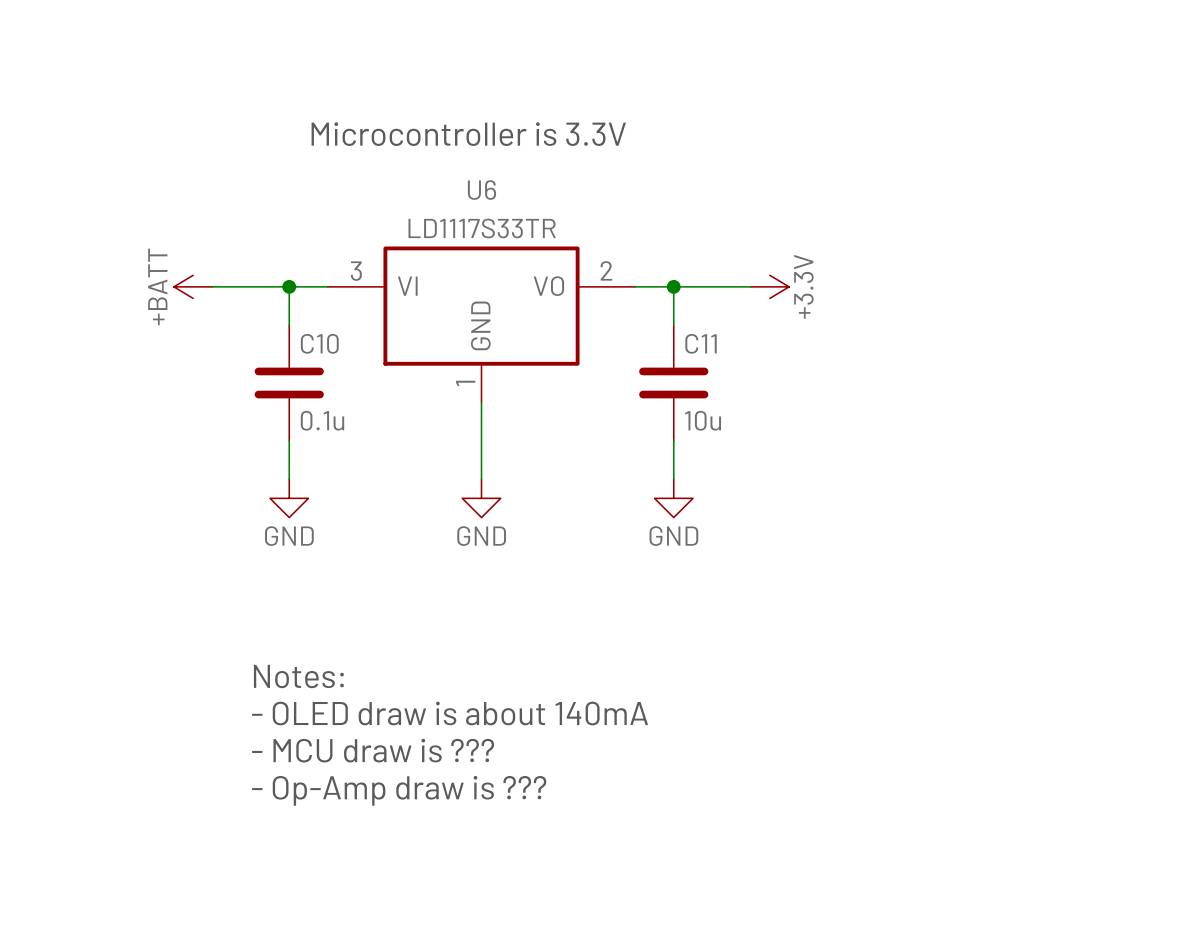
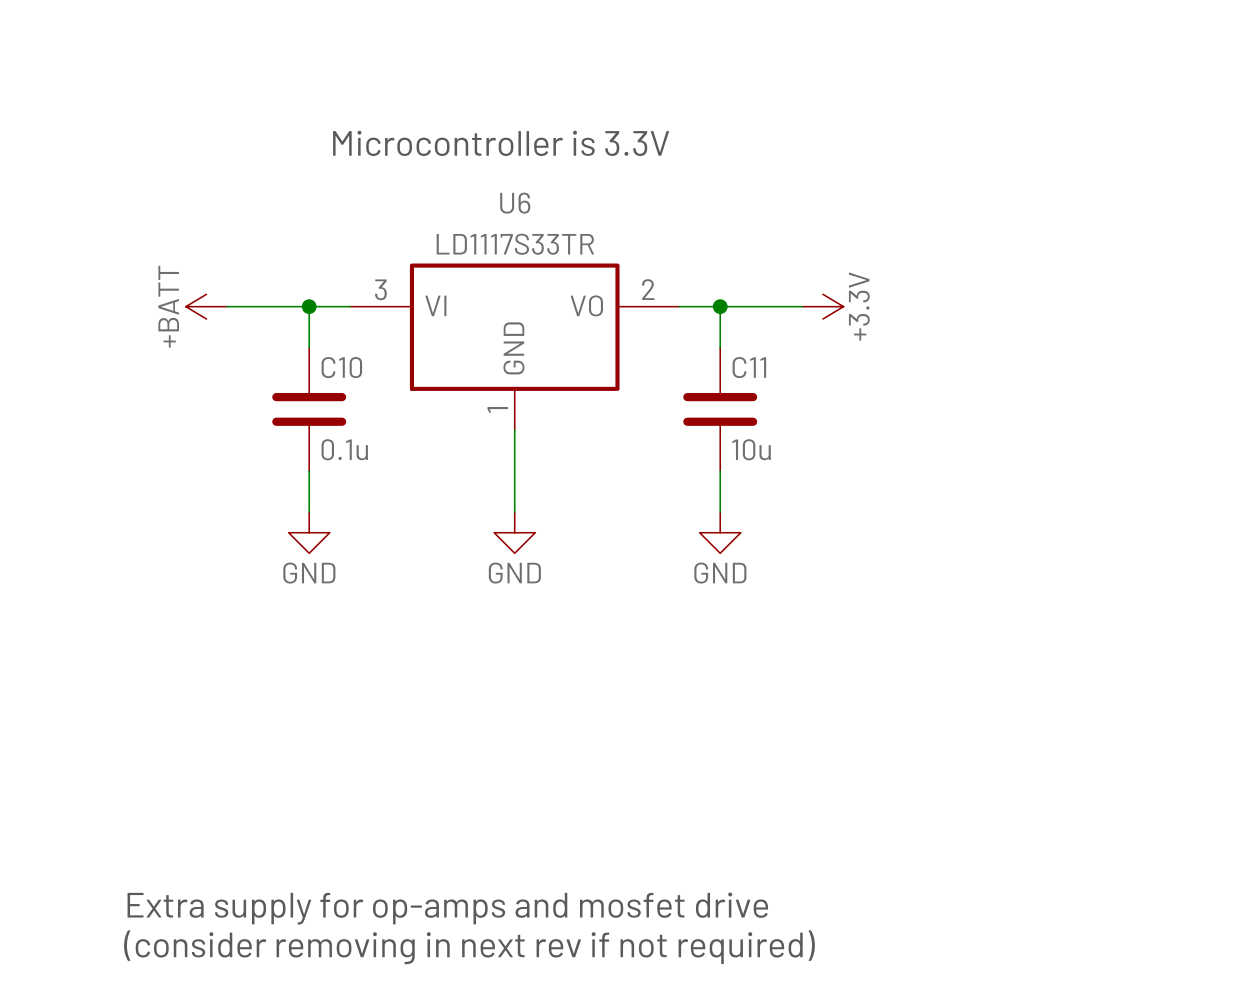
text: Notes: (298, 676) -> none
text: - OLED draw is about 140mA (450, 713) -> none
text: - MCU draw is ??? (373, 750) -> none
text: - Op-Amp draw is ??? (399, 790) -> none
text: none -> Extra supply for op-amps and mosfet drive (447, 908)
text: none -> (consider removing in next rev if not required) (469, 947)

